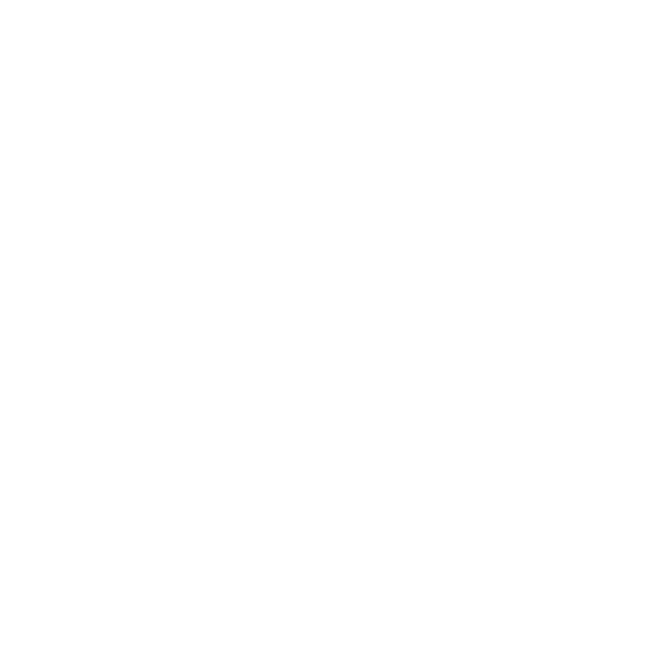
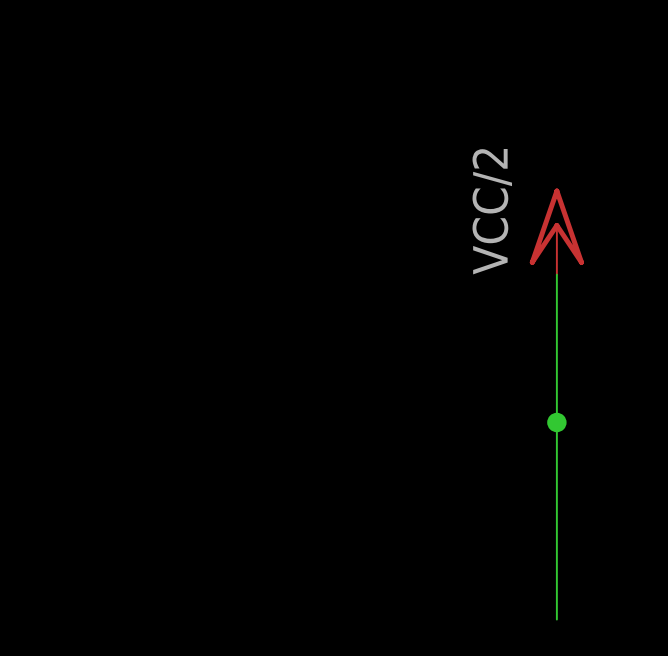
power symbol: none -> VCC/2 (556, 231)
wire: none -> (556, 274) (556, 619)
junction: none -> (556, 422)

